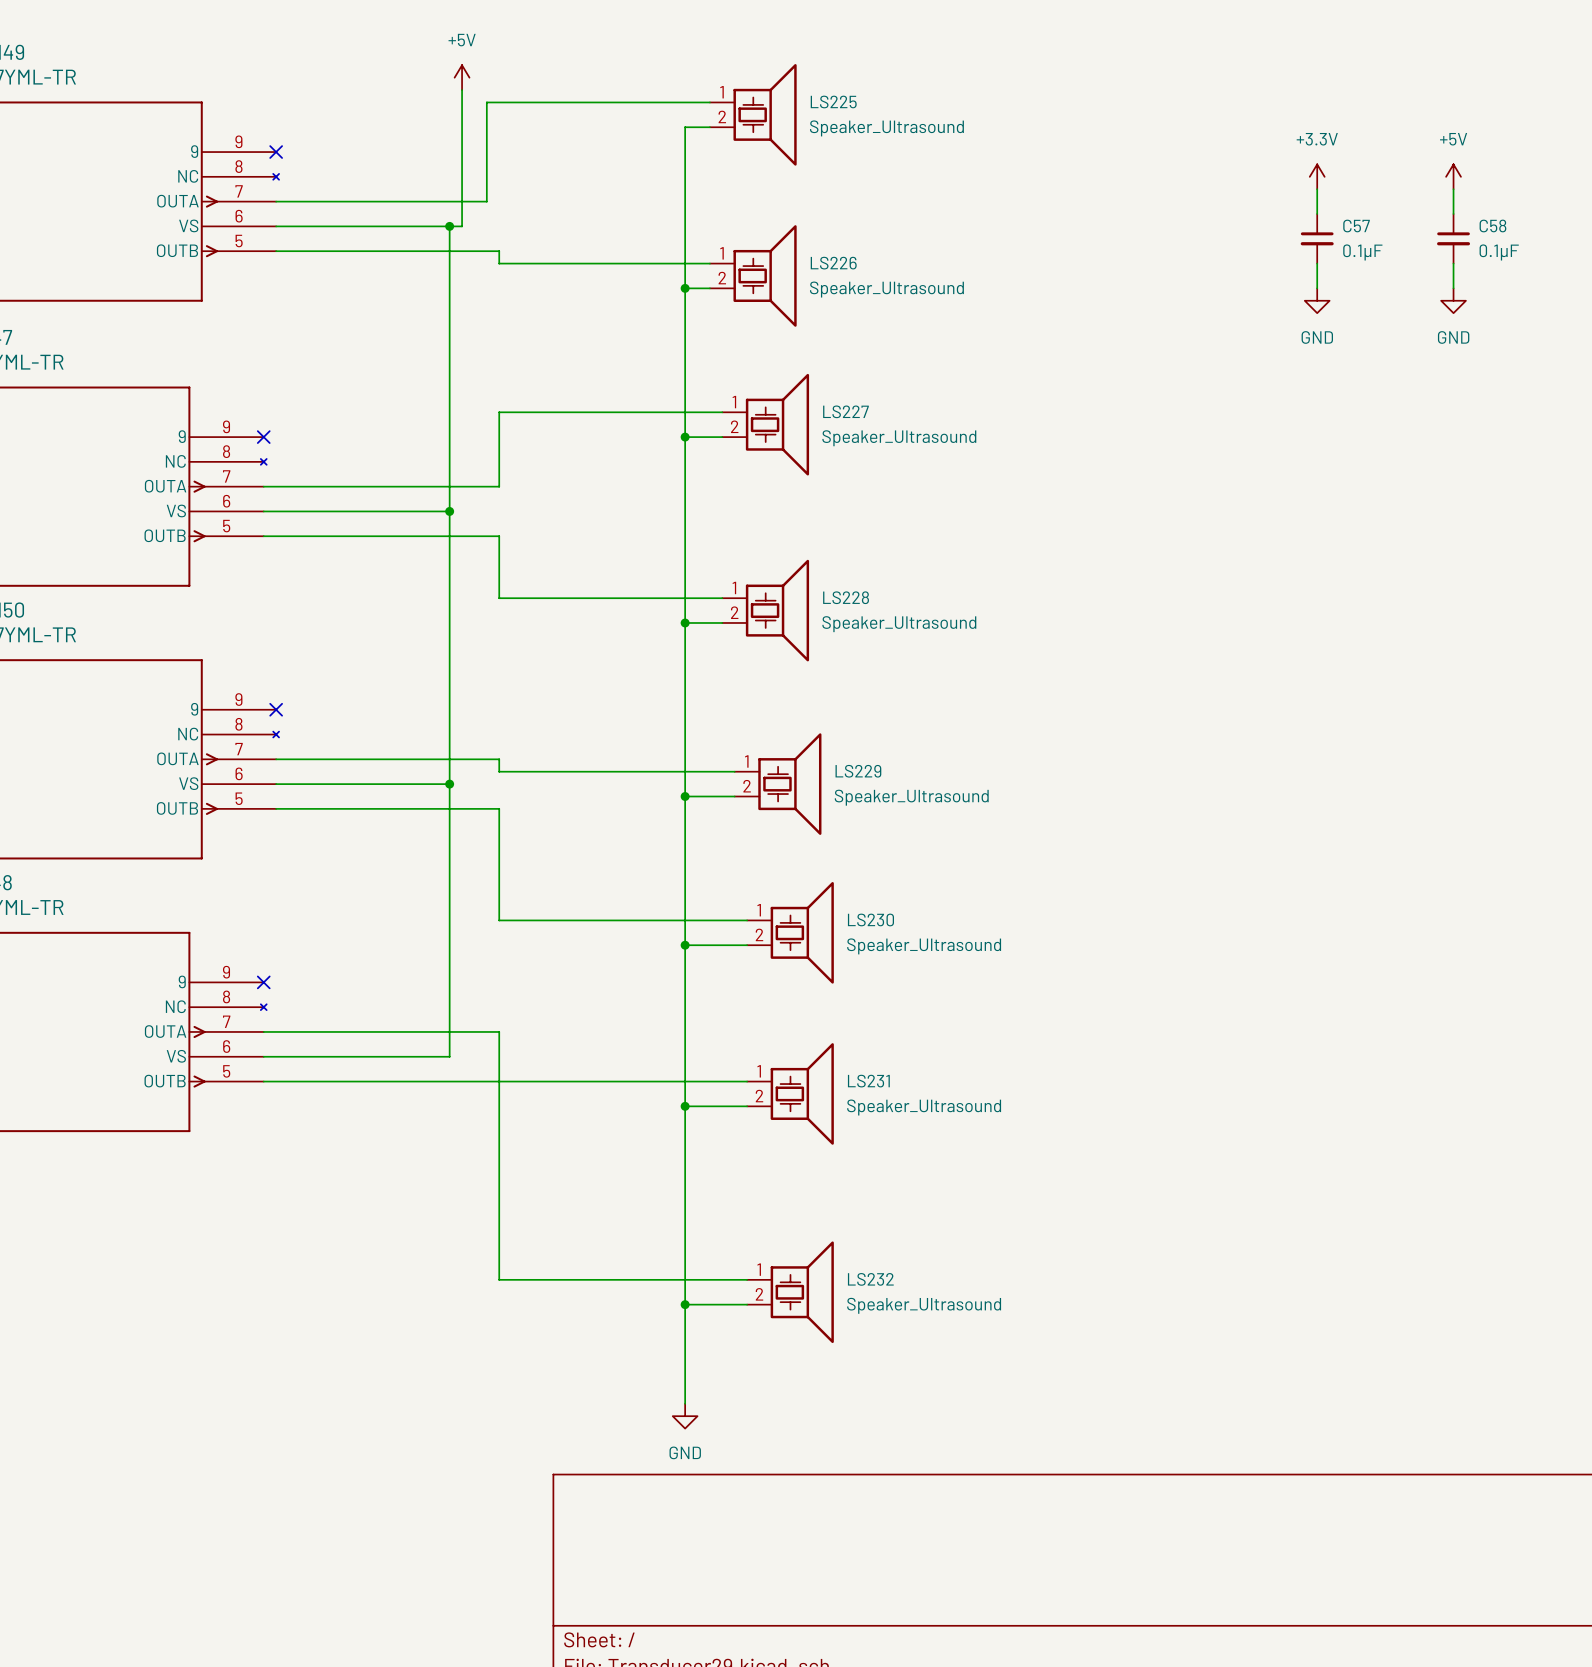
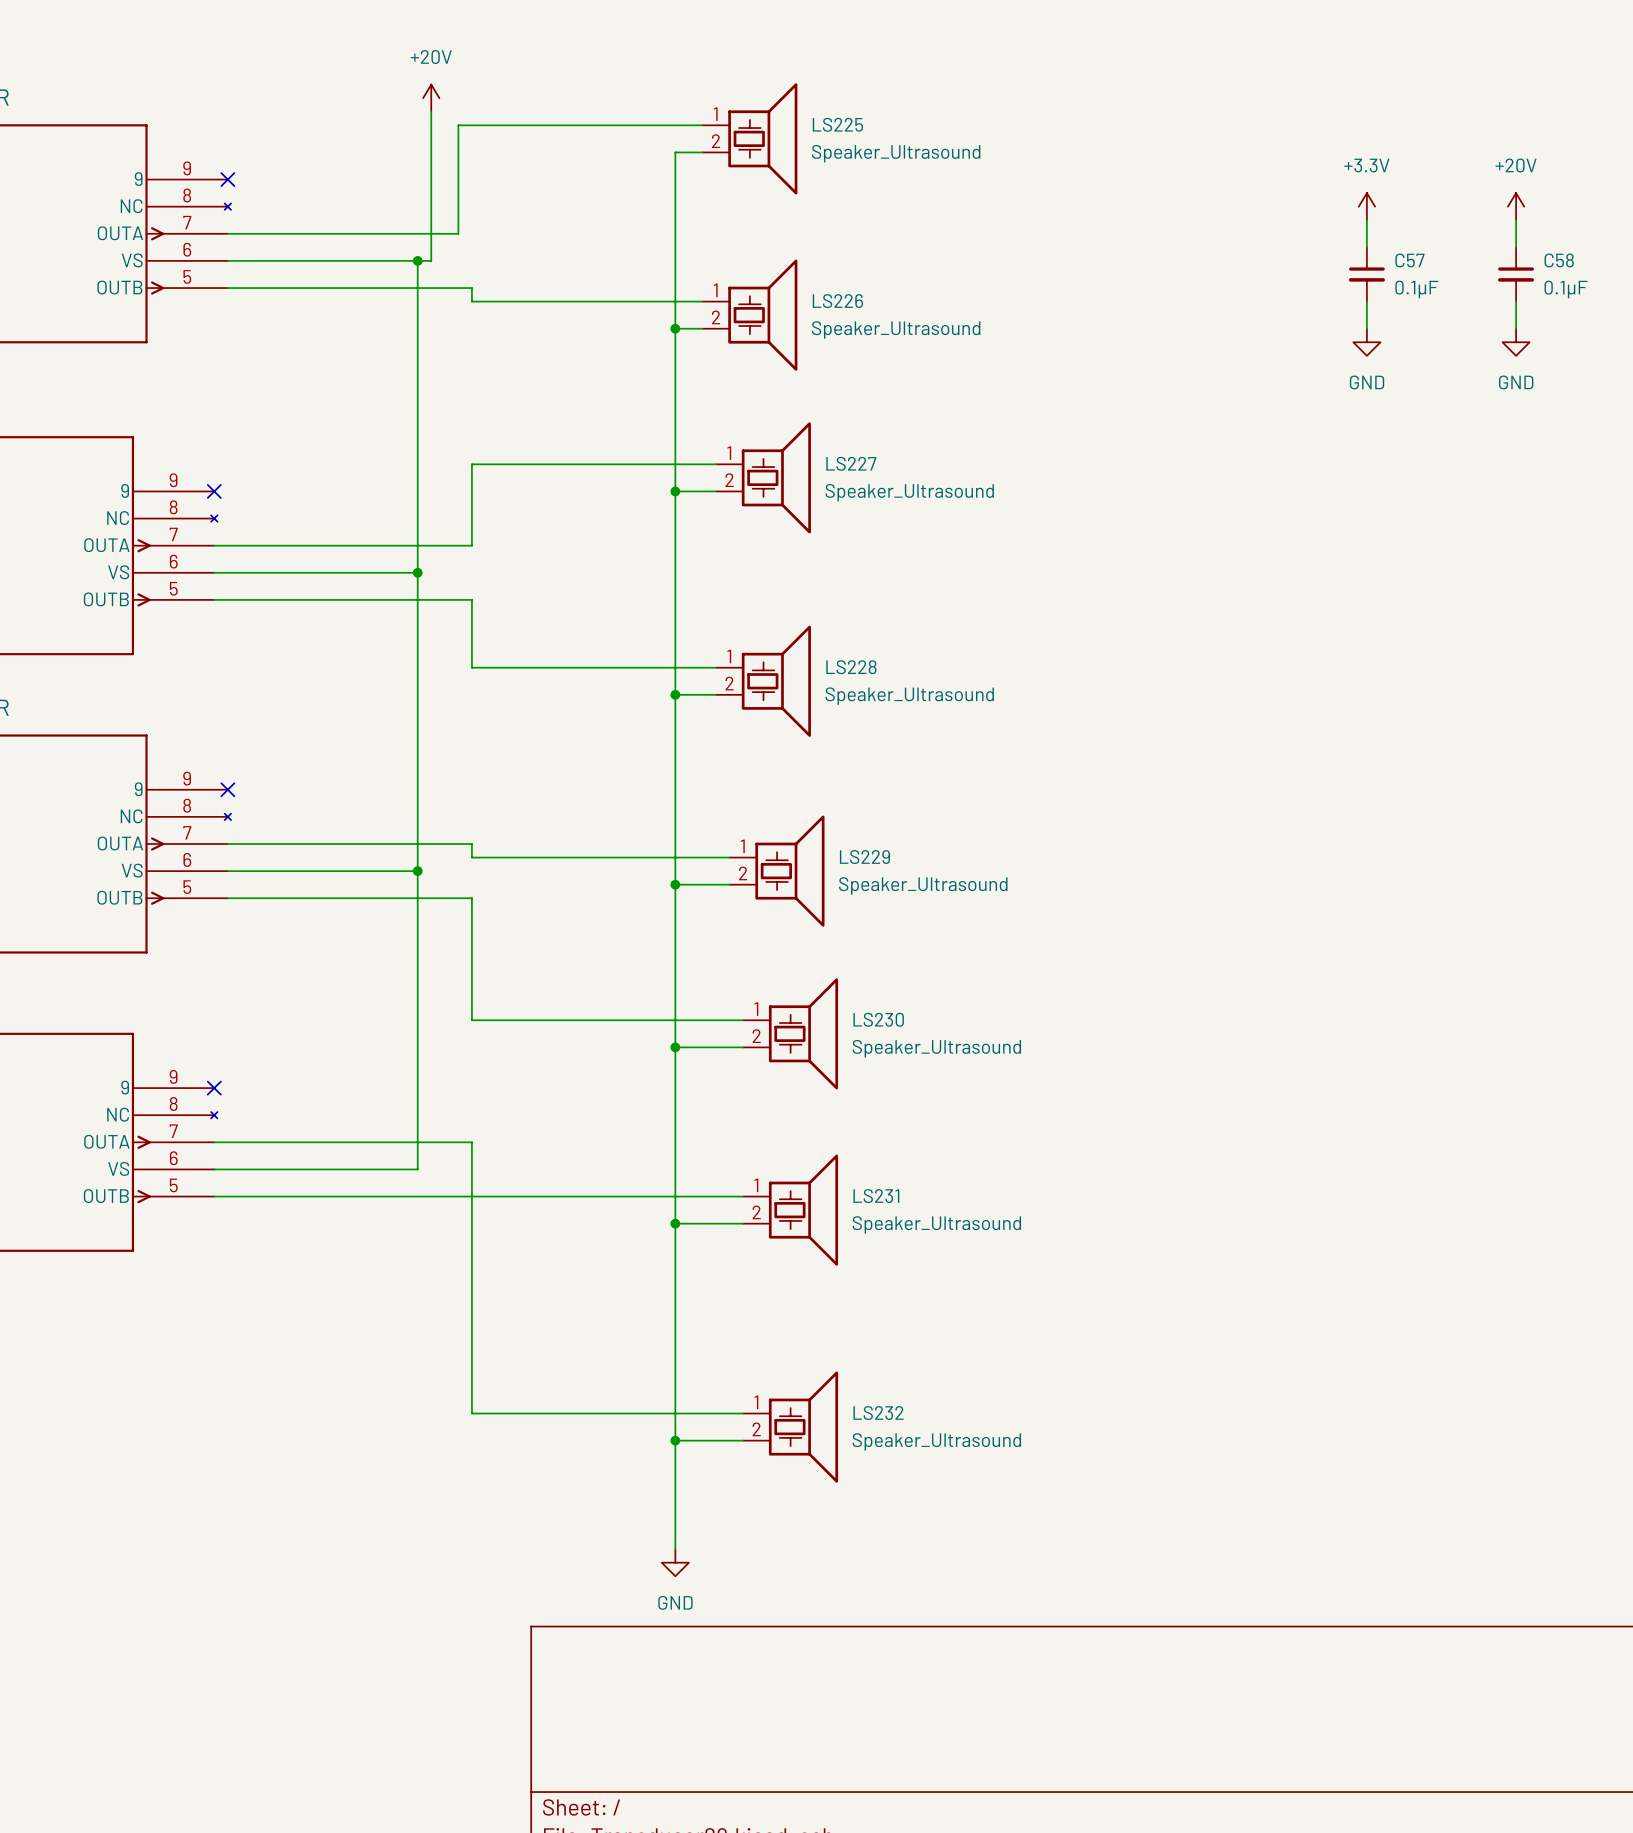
power symbol: +5V (462, 77) -> +20V (431, 98)
power symbol: +5V (1453, 176) -> +20V (1516, 206)

